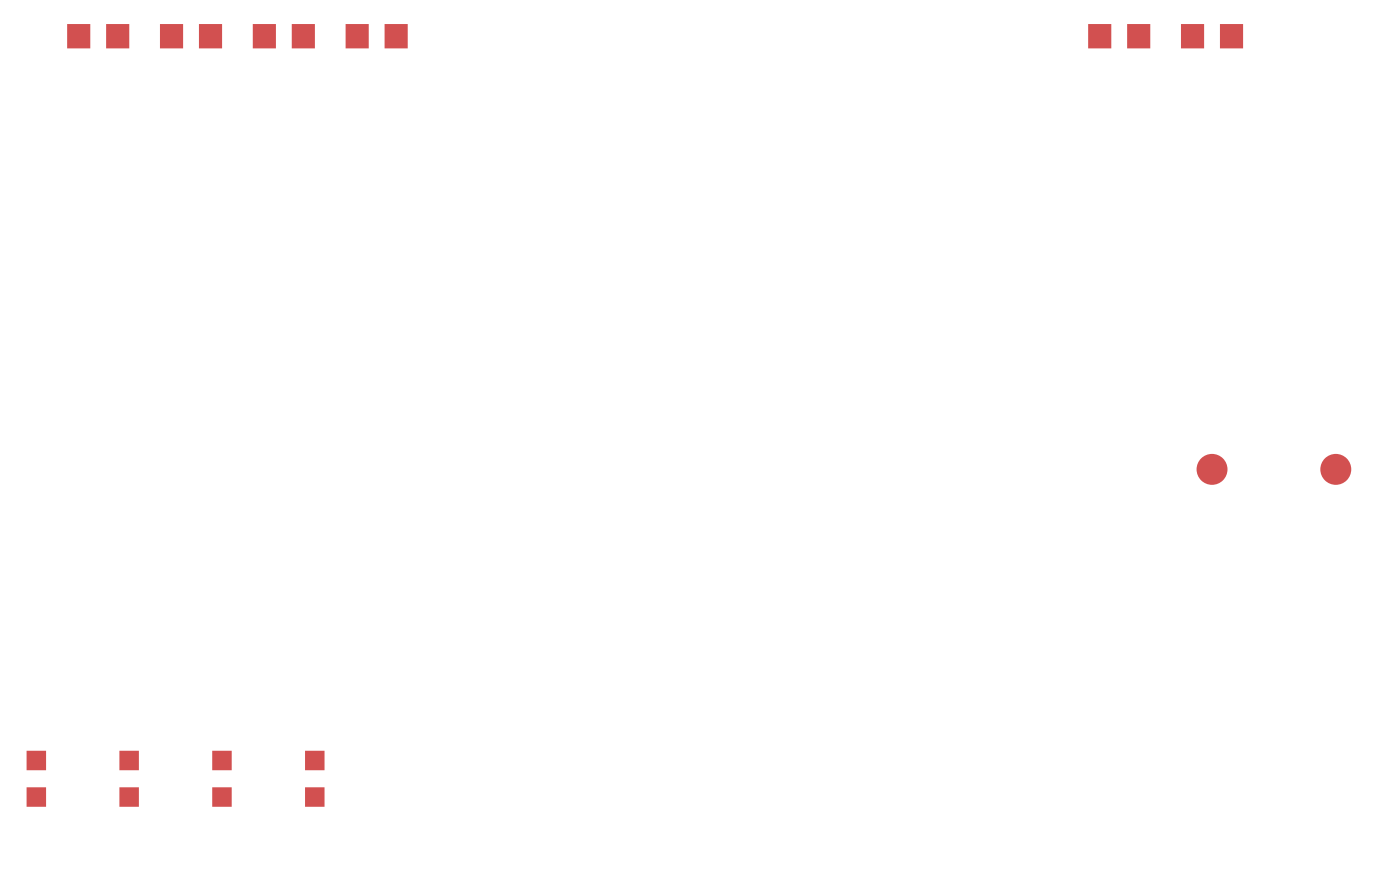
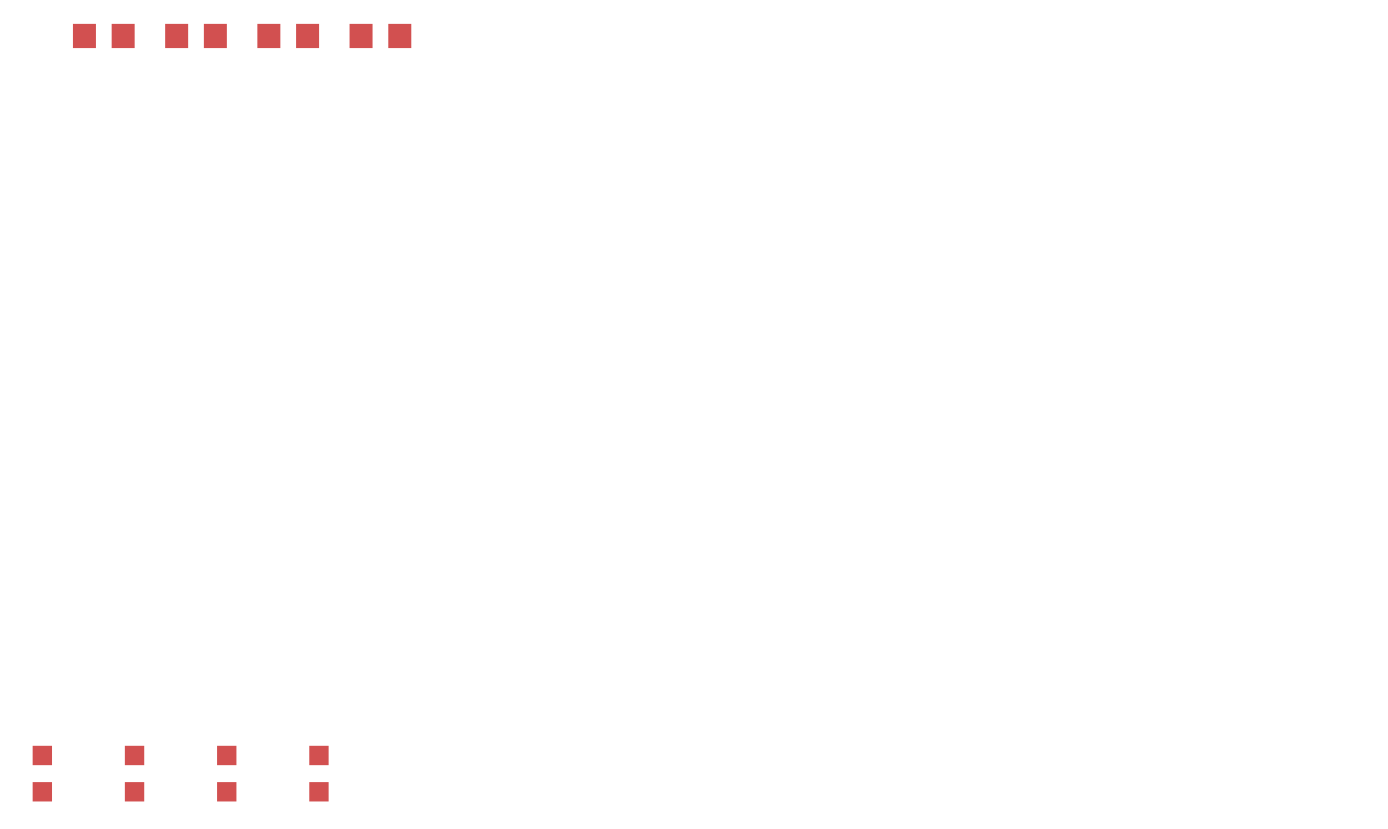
part: (1119, 36) -> none
part: (1212, 36) -> none
part: (1212, 469) -> none
part: (1335, 469) -> none

